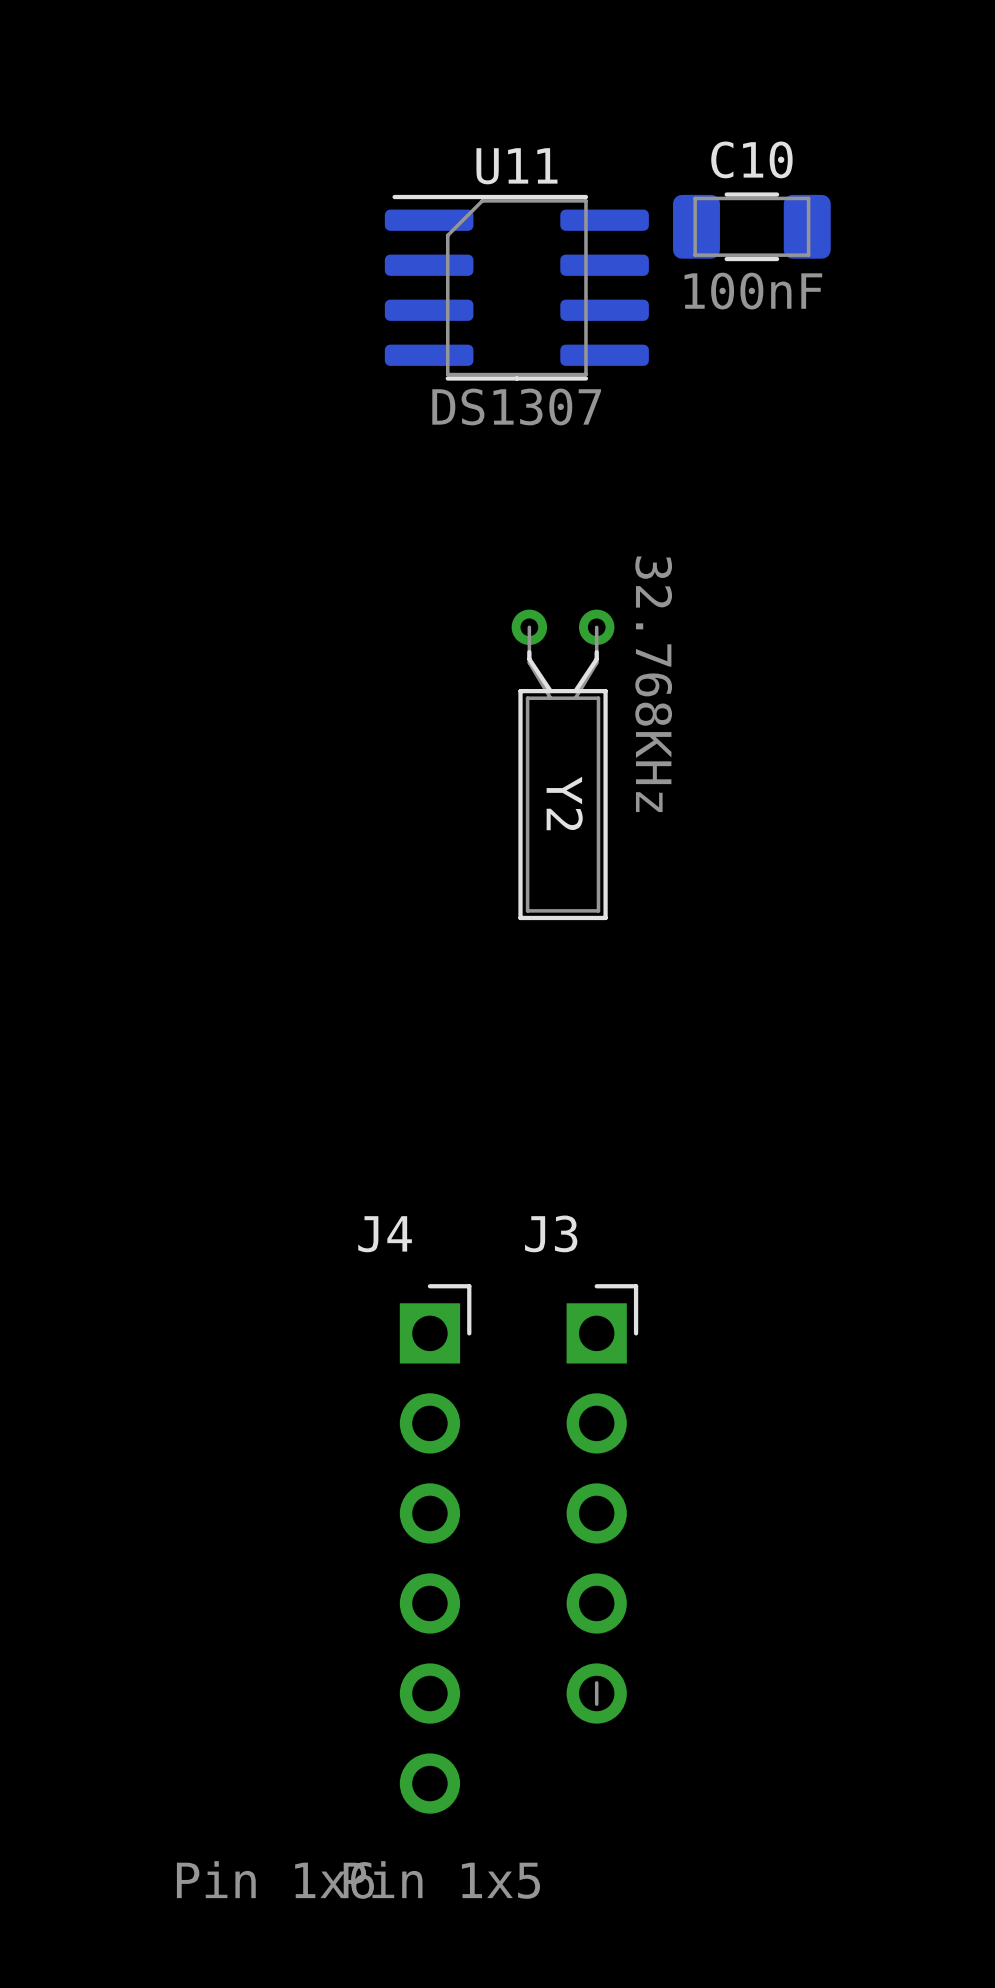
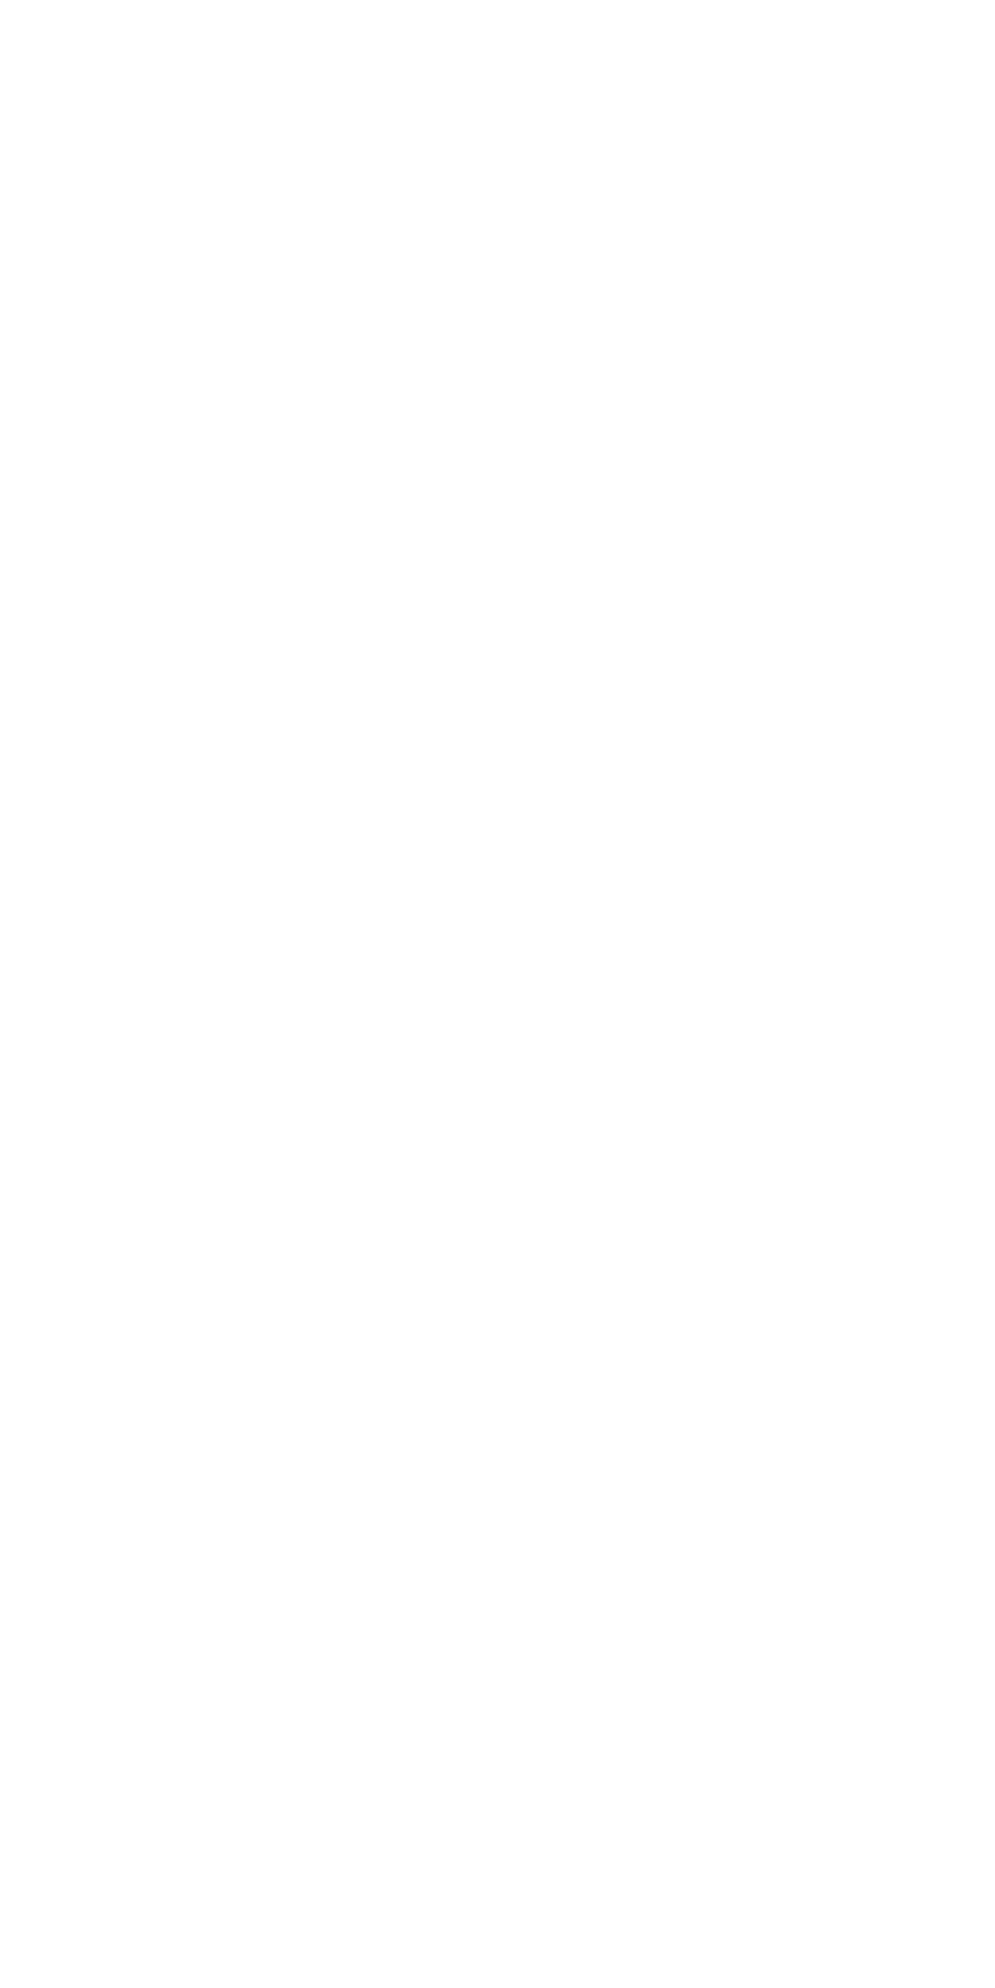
C10: 100nF (751, 226) -> none
U11: DS1307 (516, 287) -> none
Y2: 32.768KHz (563, 764) -> none
J3: Pin 1x5 (602, 1503) -> none
J4: Pin 1x6 (435, 1548) -> none

